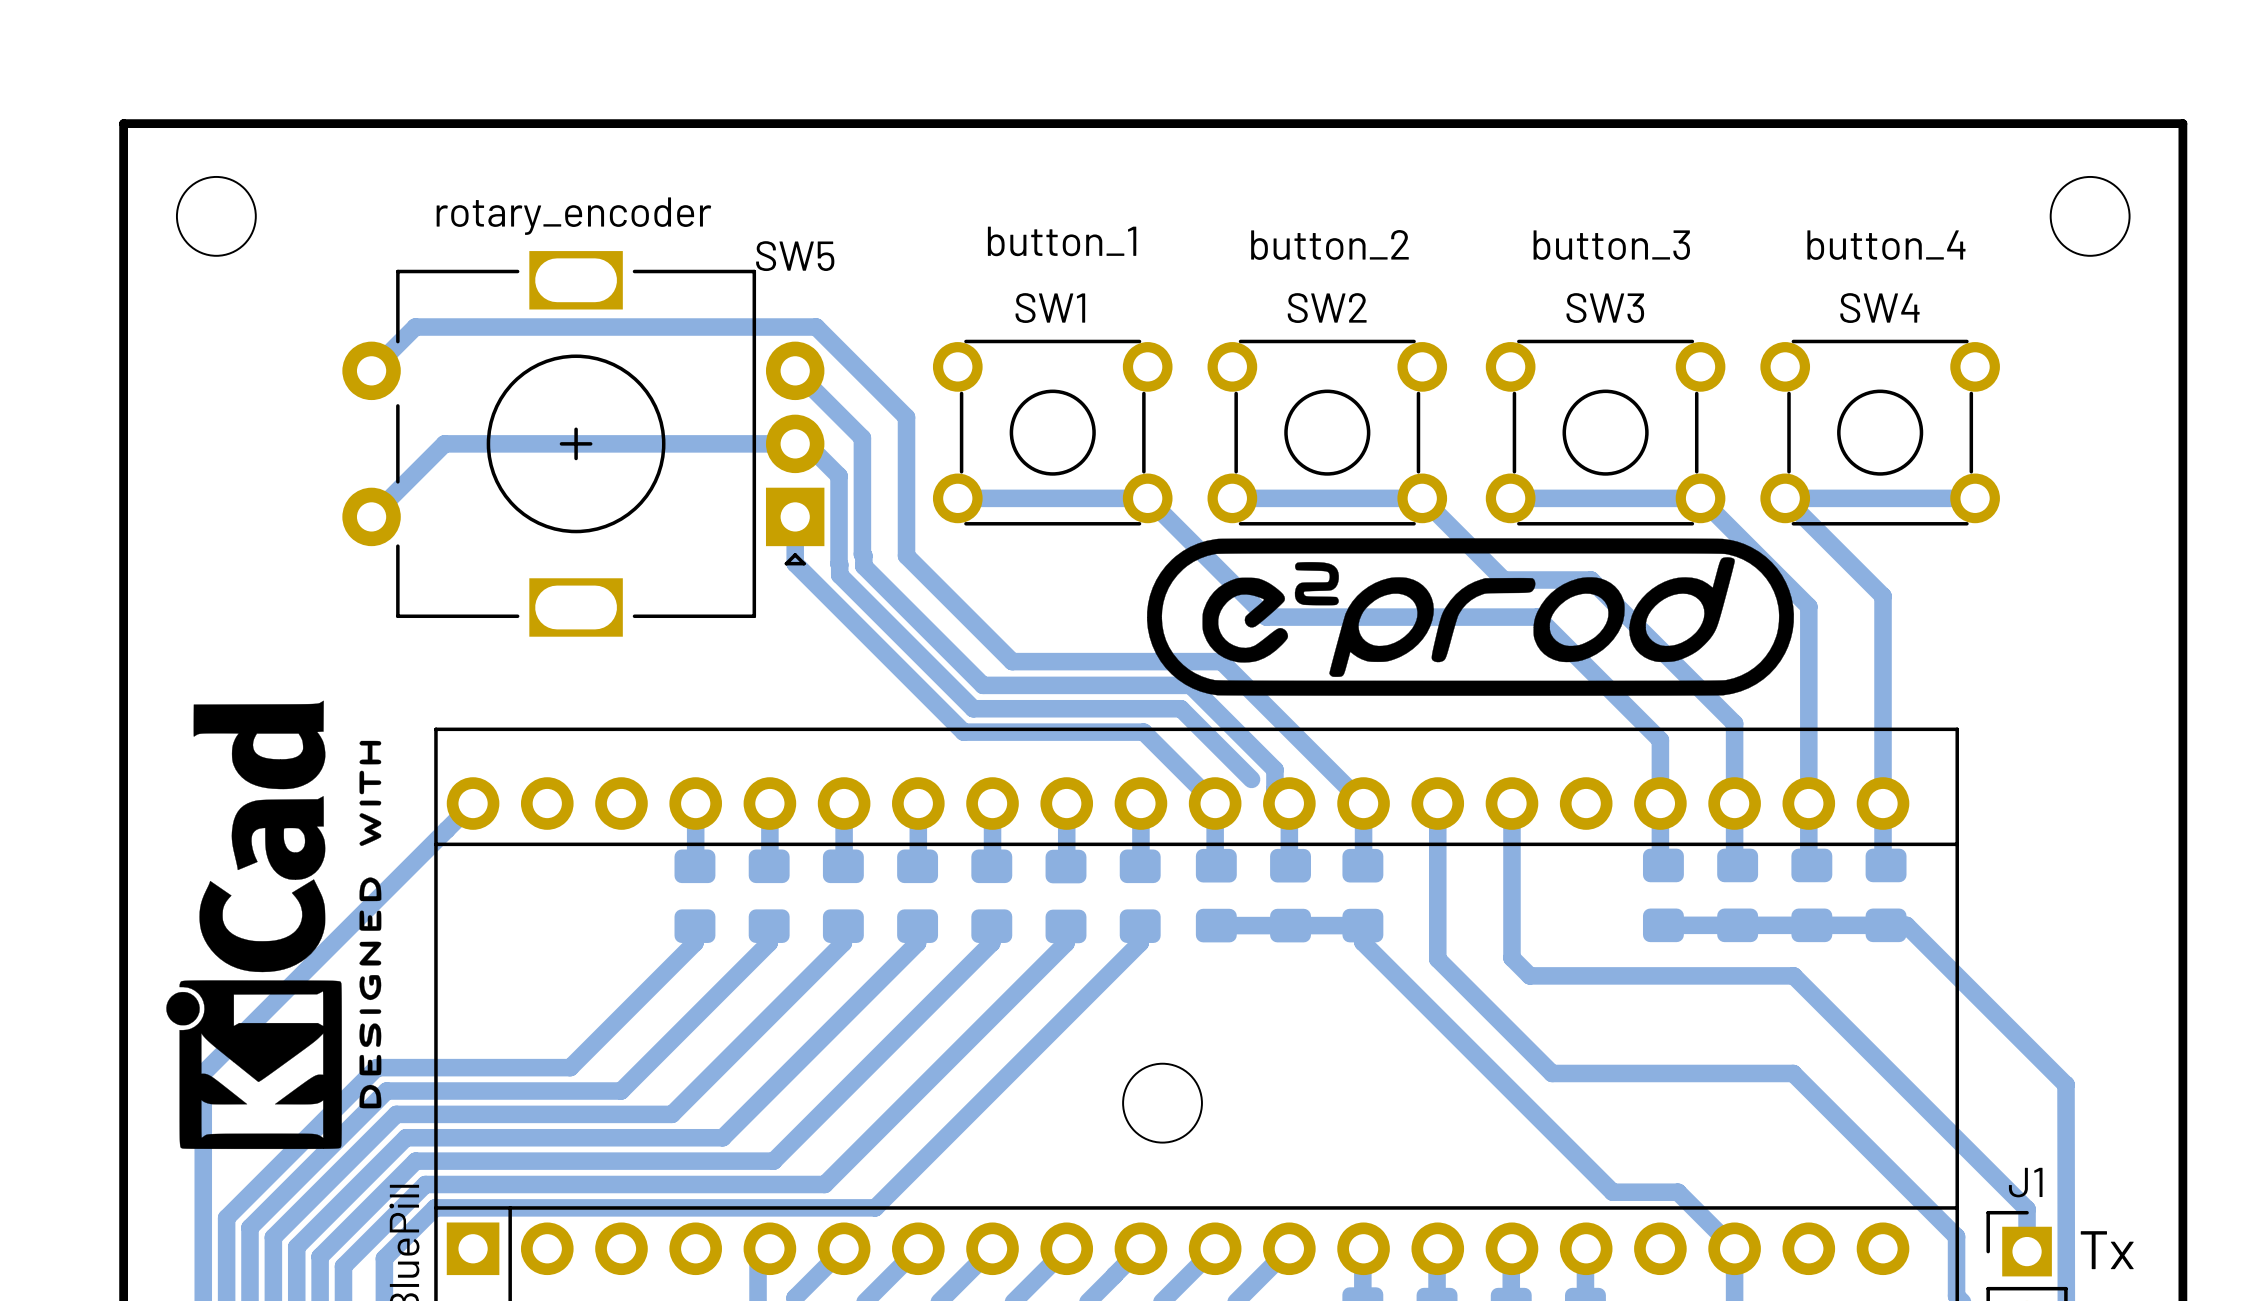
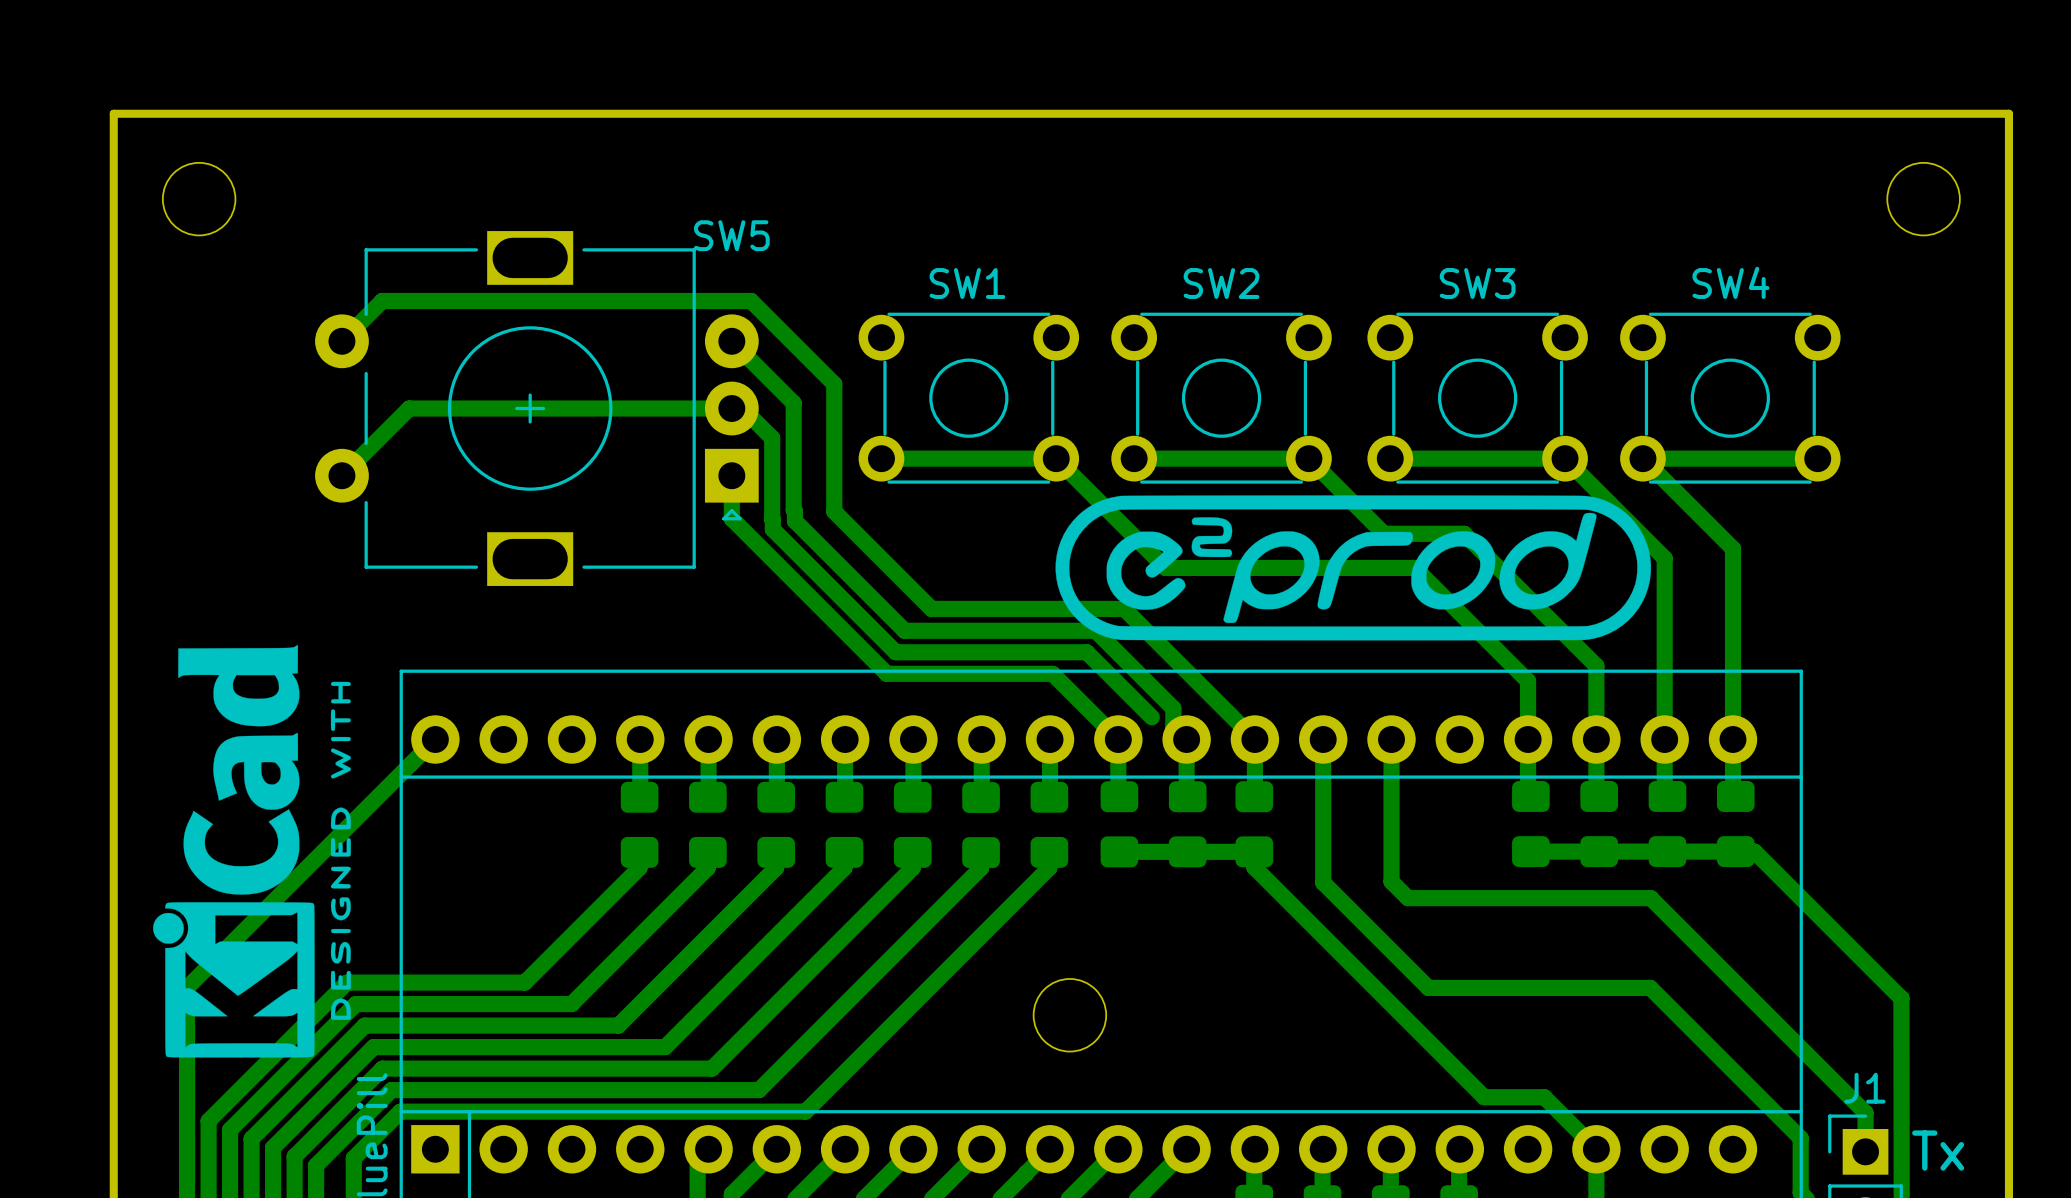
SW5 value: rotary_encoder (573, 216) -> none
SW1 value: button_1 (1062, 241) -> none
SW2 value: button_2 (1329, 244) -> none
SW3 value: button_3 (1611, 245) -> none
SW4 value: button_4 (1886, 245) -> none

